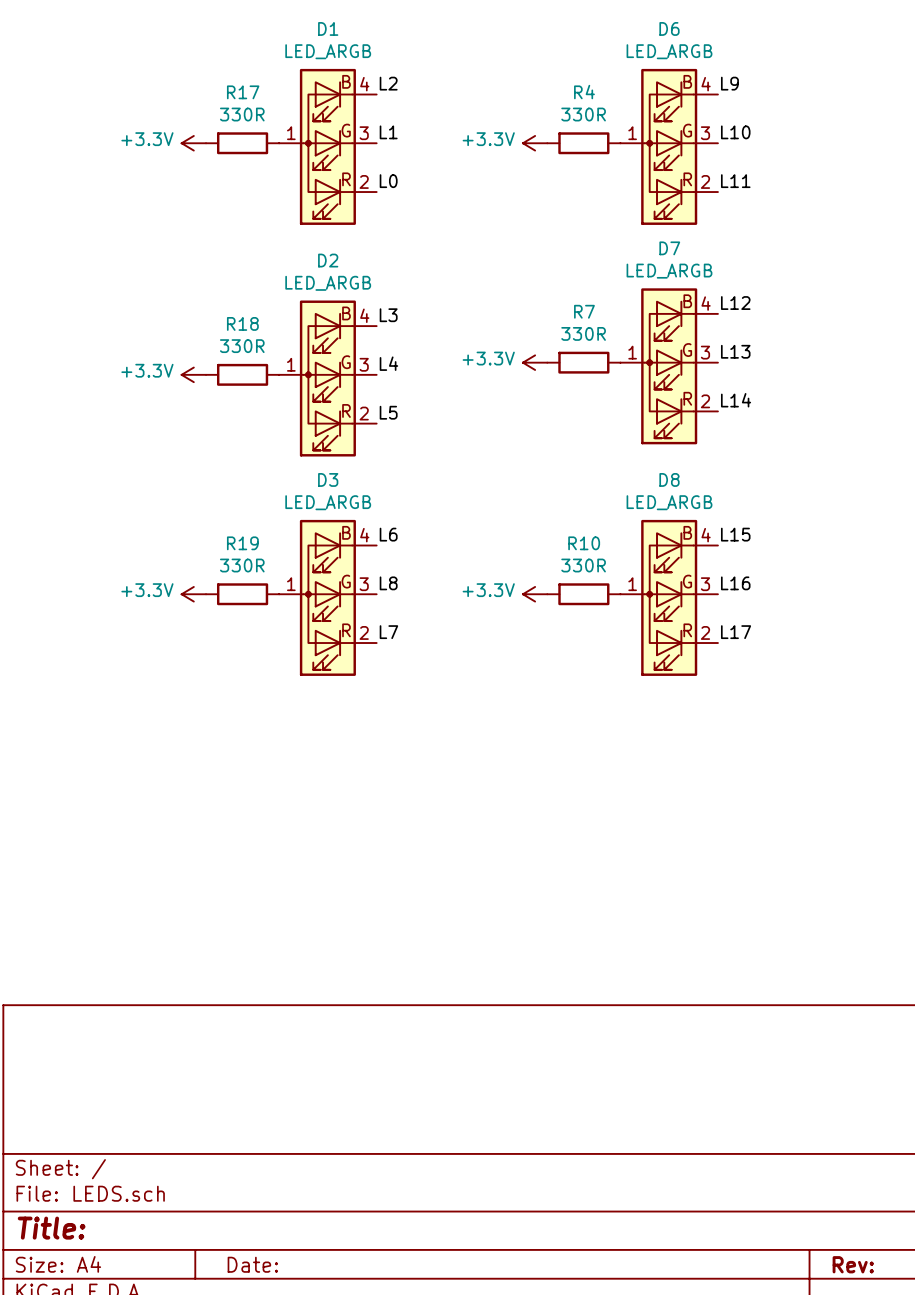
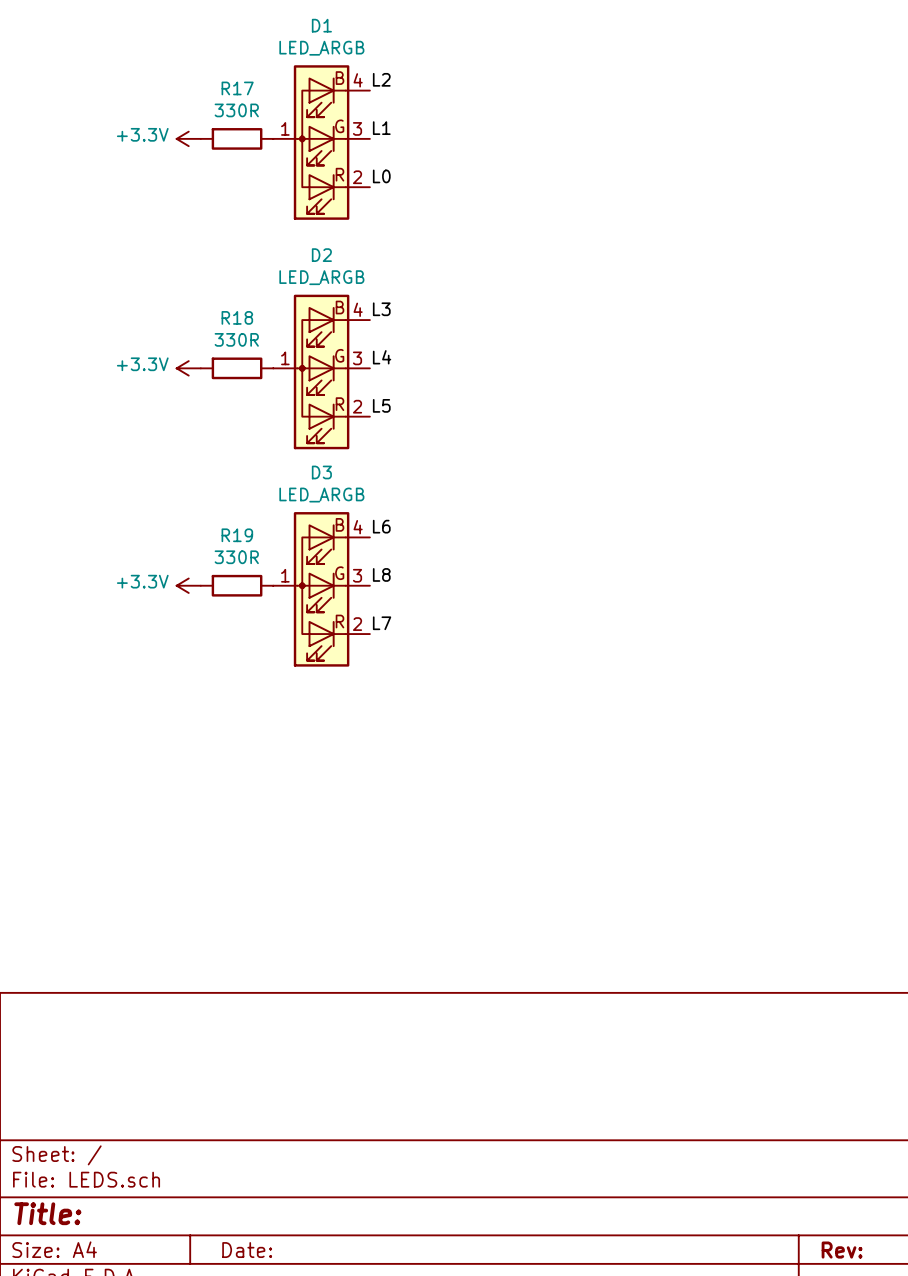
label: L9 (729, 83) -> none
label: L10 (735, 132) -> none
power symbol: +3.3V (535, 143) -> none
R4: 330R (583, 143) -> none
D6: LED_ARGB (669, 146) -> none
label: L11 (735, 181) -> none
label: L12 (735, 303) -> none
label: L13 (735, 351) -> none
power symbol: +3.3V (535, 362) -> none
R7: 330R (583, 362) -> none
D7: LED_ARGB (669, 366) -> none
label: L14 (736, 400) -> none
label: L15 (735, 534) -> none
label: L16 (735, 583) -> none
power symbol: +3.3V (535, 594) -> none
R10: 330R (583, 594) -> none
D8: LED_ARGB (669, 597) -> none
label: L17 (736, 632) -> none

